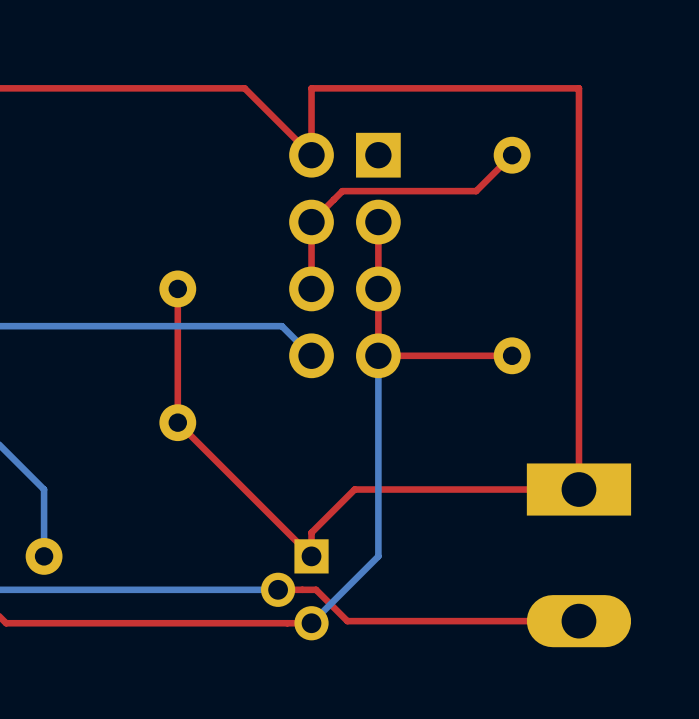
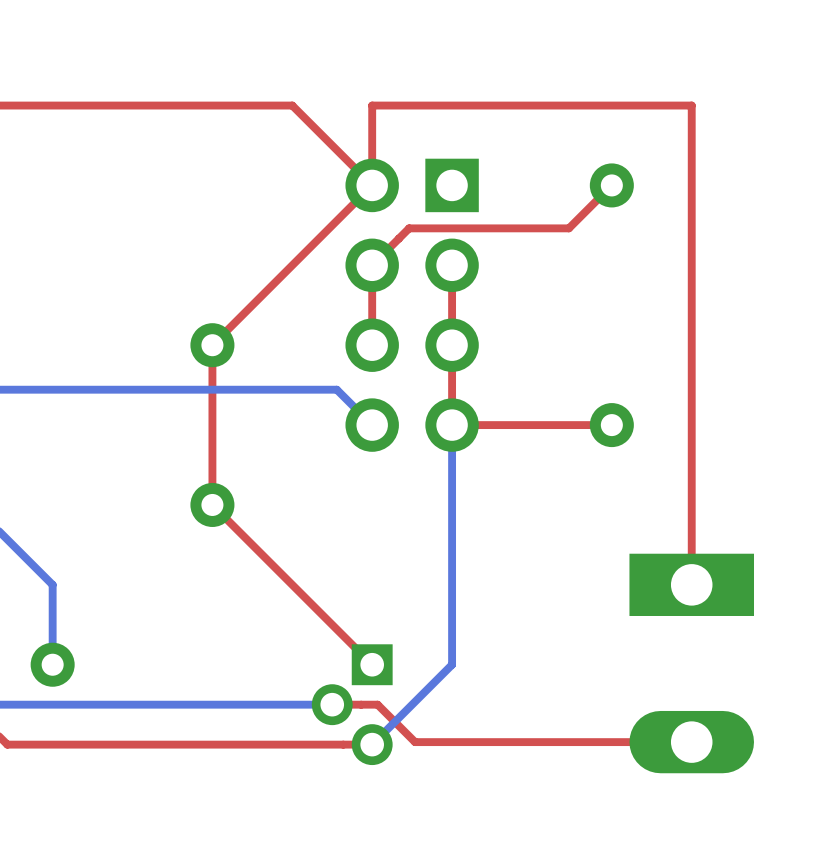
top track: none -> (372, 185) (212, 345)
top track: (578, 489) (354, 489) (311, 532) (311, 556) -> none

